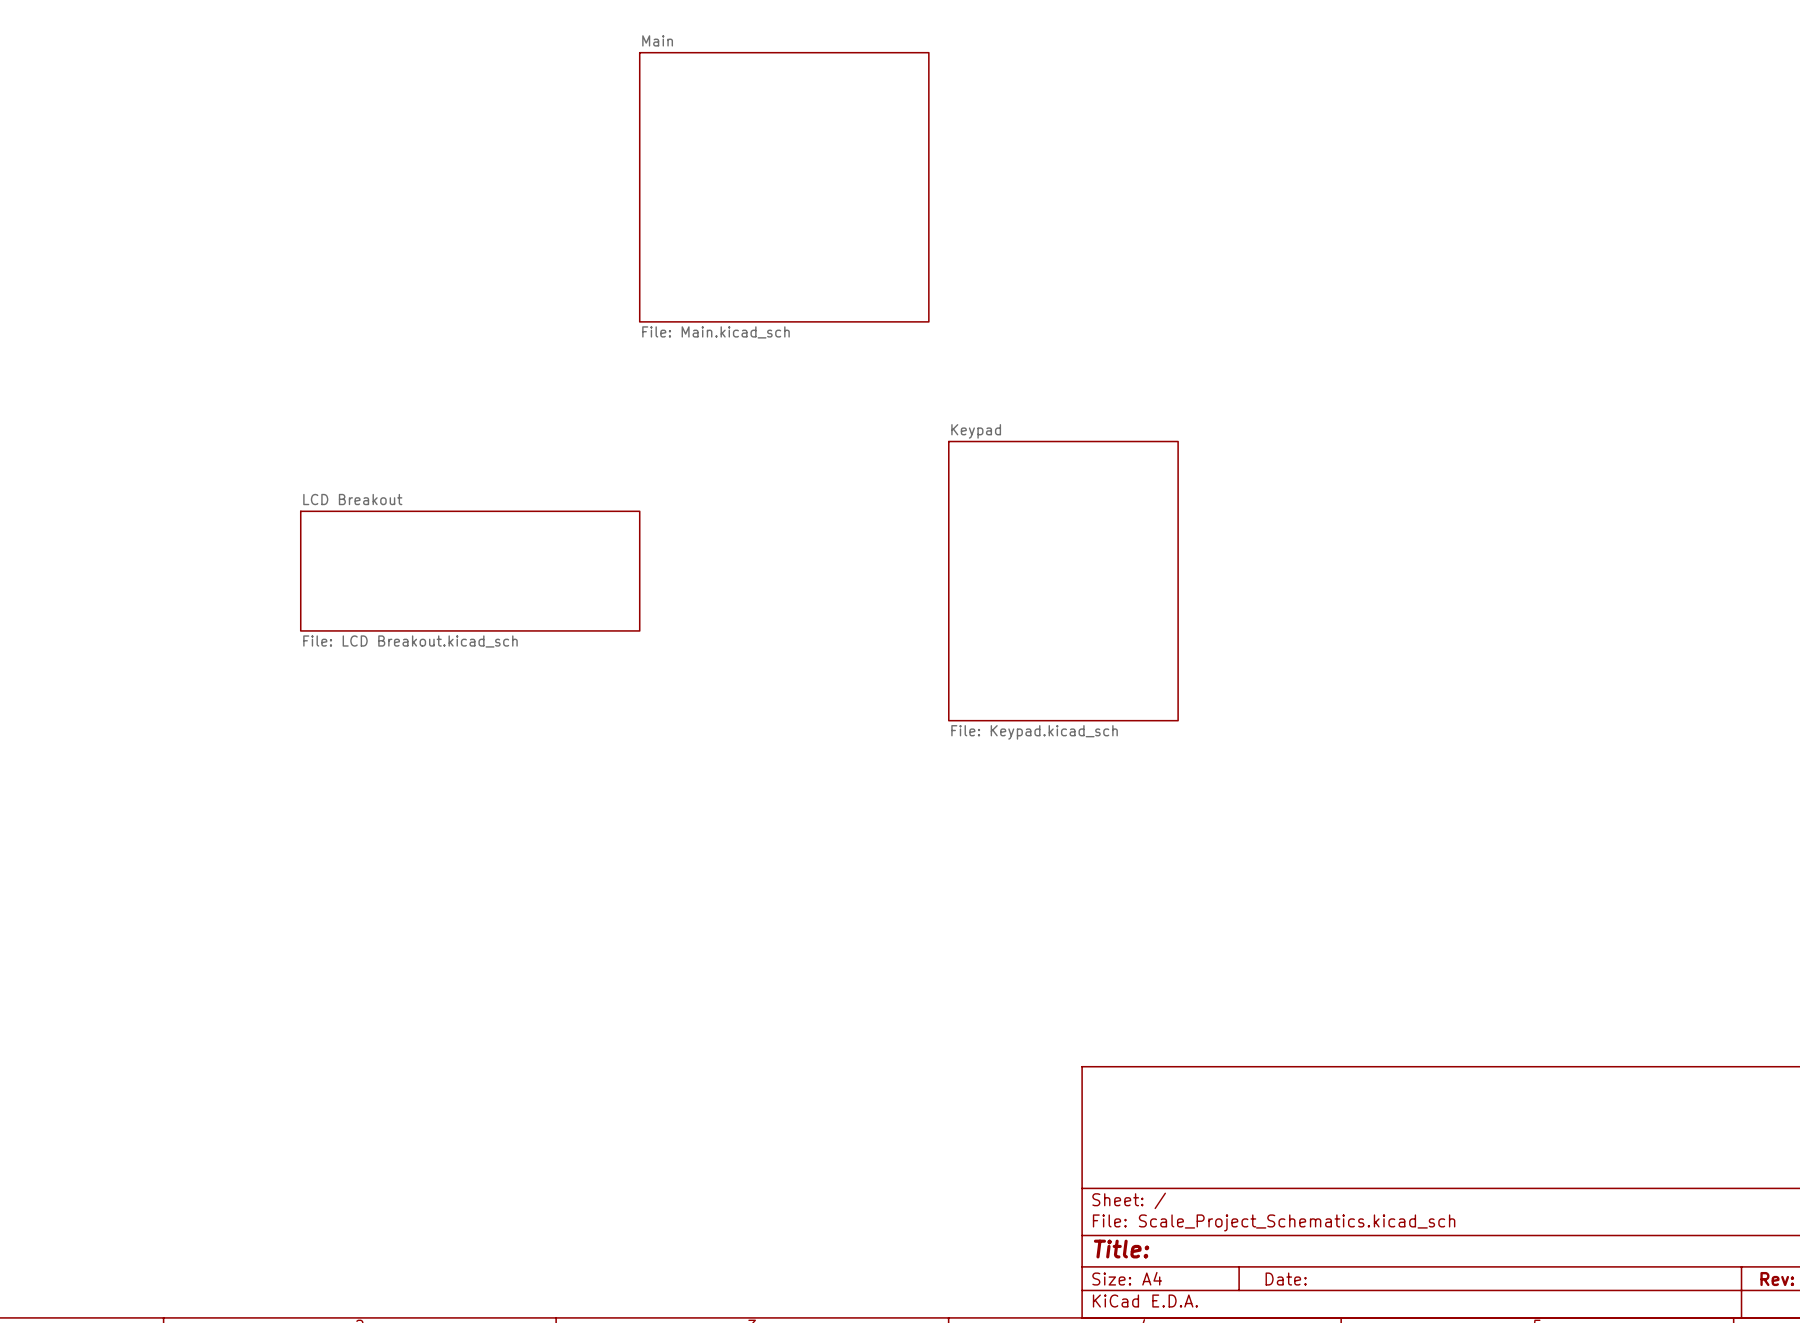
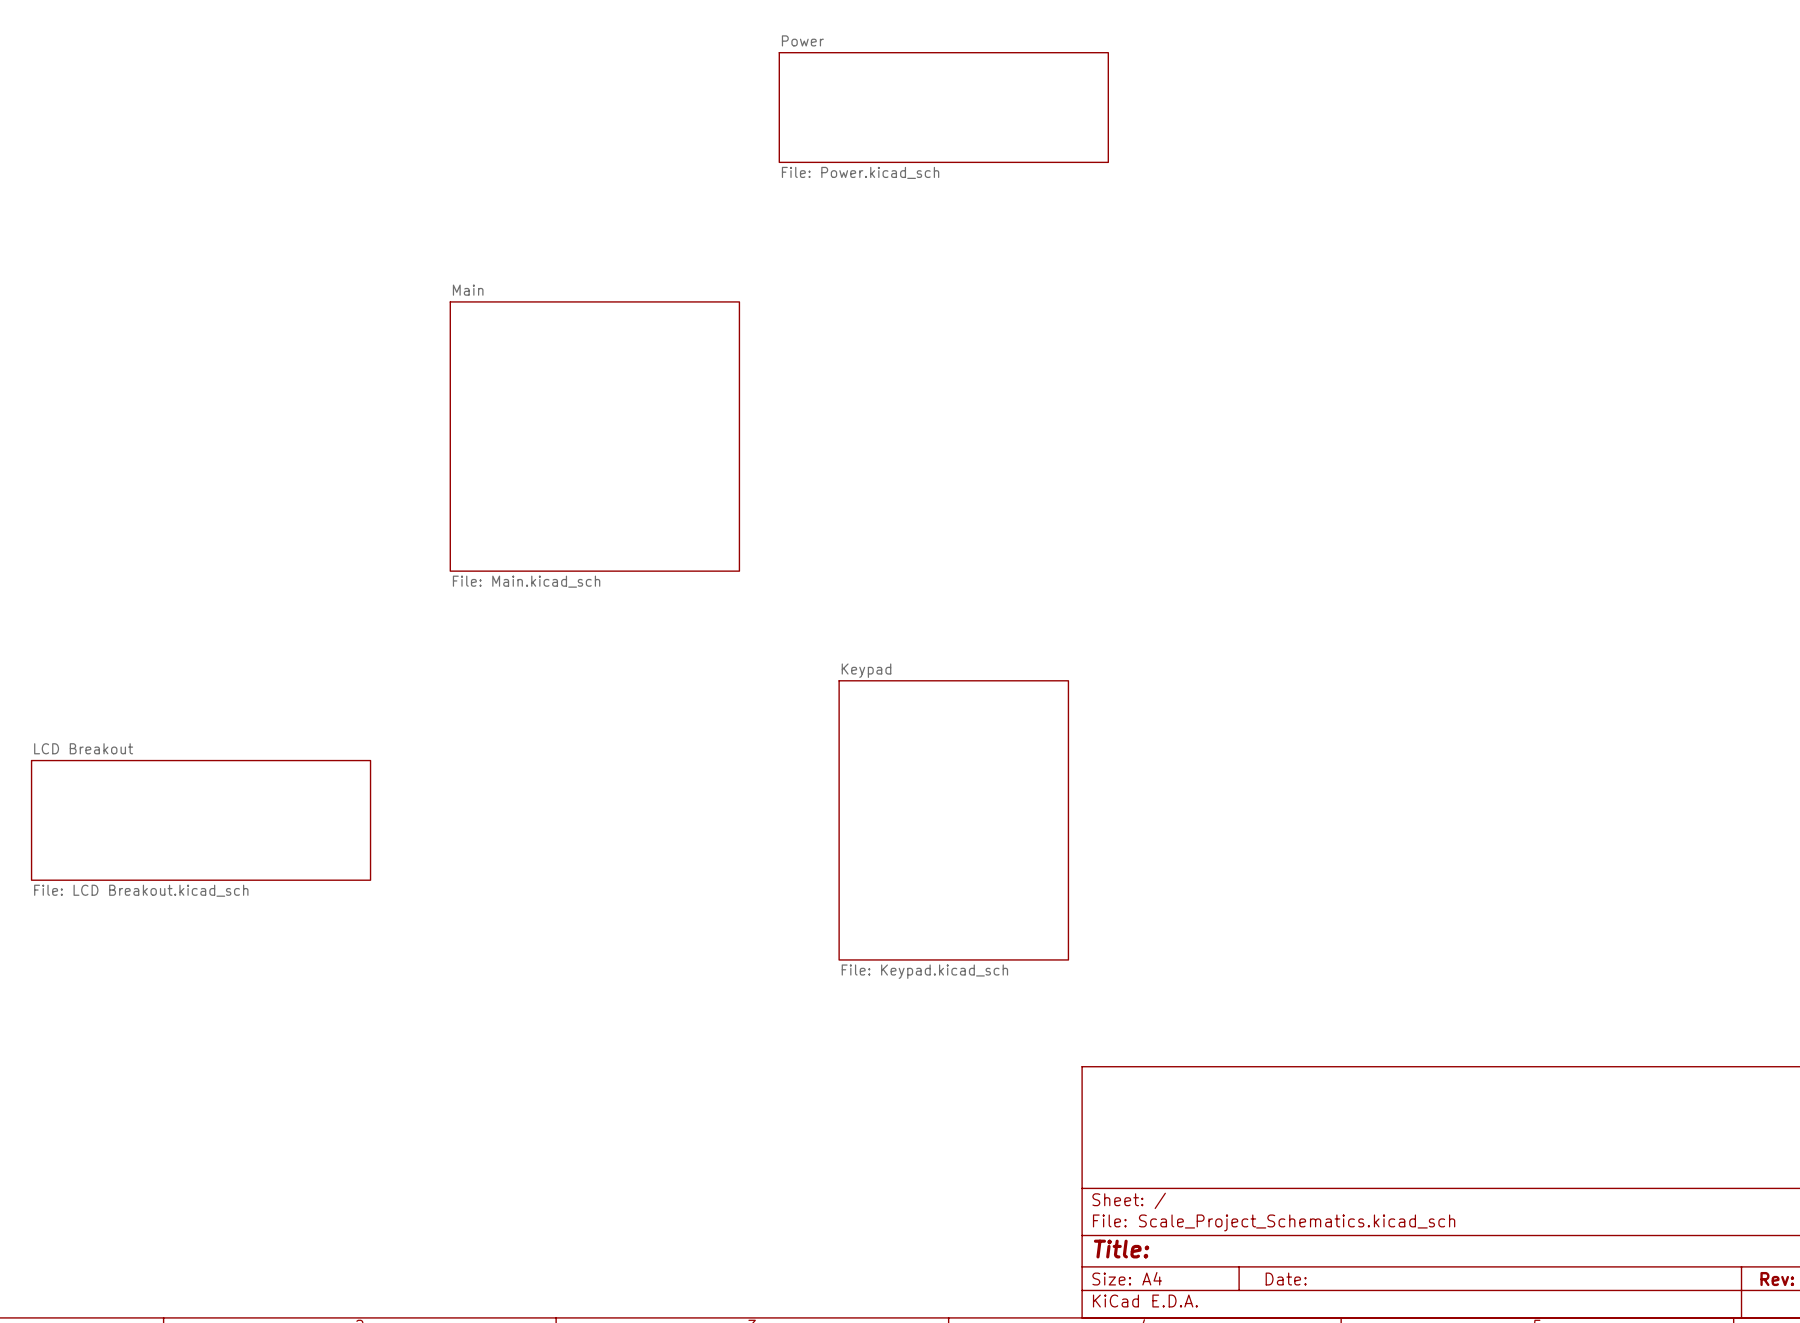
sheet Power: none -> File: Power.kicad_sch (943, 107)
sheet Main: File: Main.kicad_sch (784, 187) -> none
sheet Main: none -> File: Main.kicad_sch (594, 436)
sheet LCD Breakout: File: LCD Breakout.kicad_sch (470, 571) -> none
sheet Keypad: File: Keypad.kicad_sch (1063, 581) -> none
sheet LCD Breakout: none -> File: LCD Breakout.kicad_sch (201, 820)
sheet Keypad: none -> File: Keypad.kicad_sch (953, 820)

